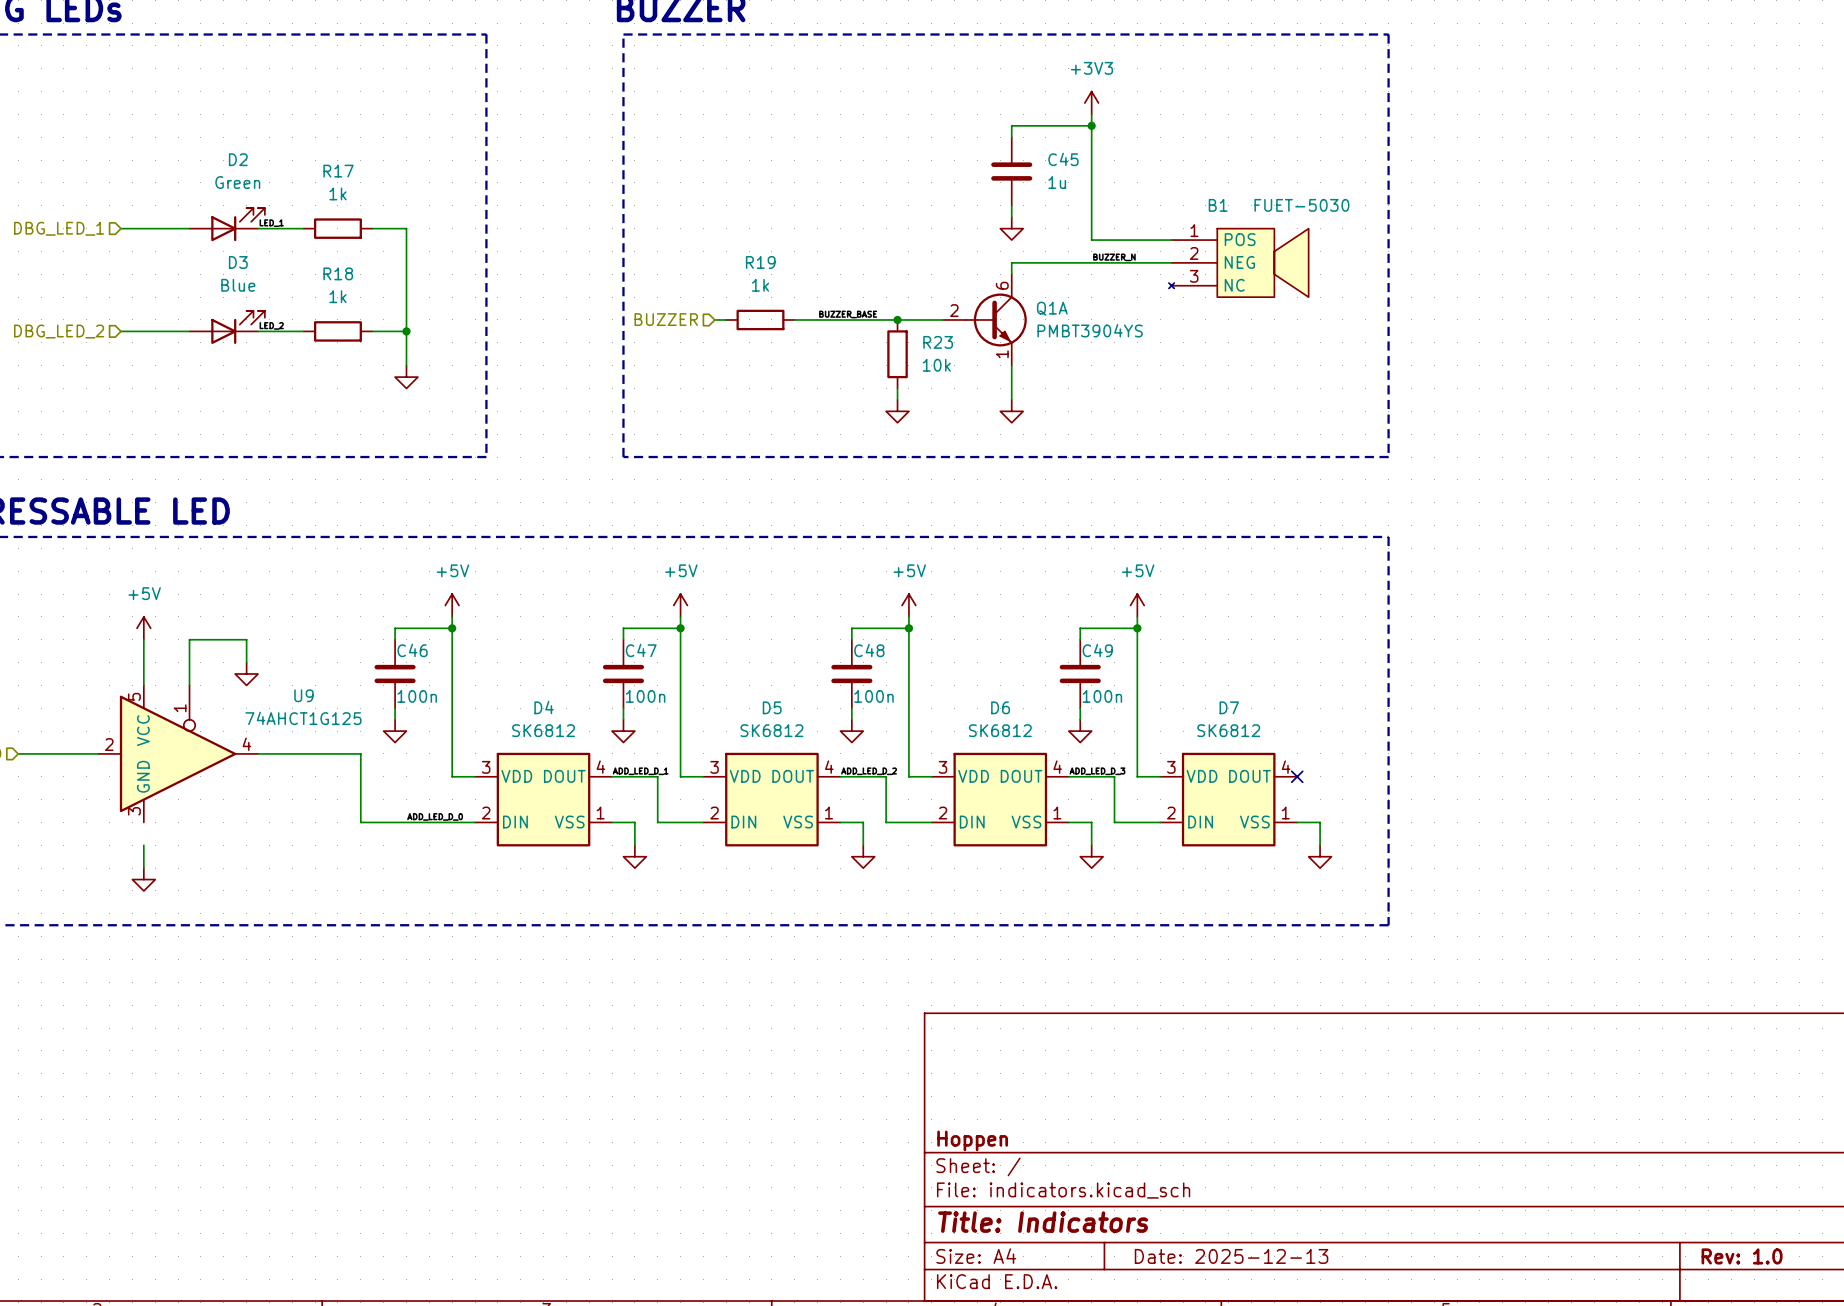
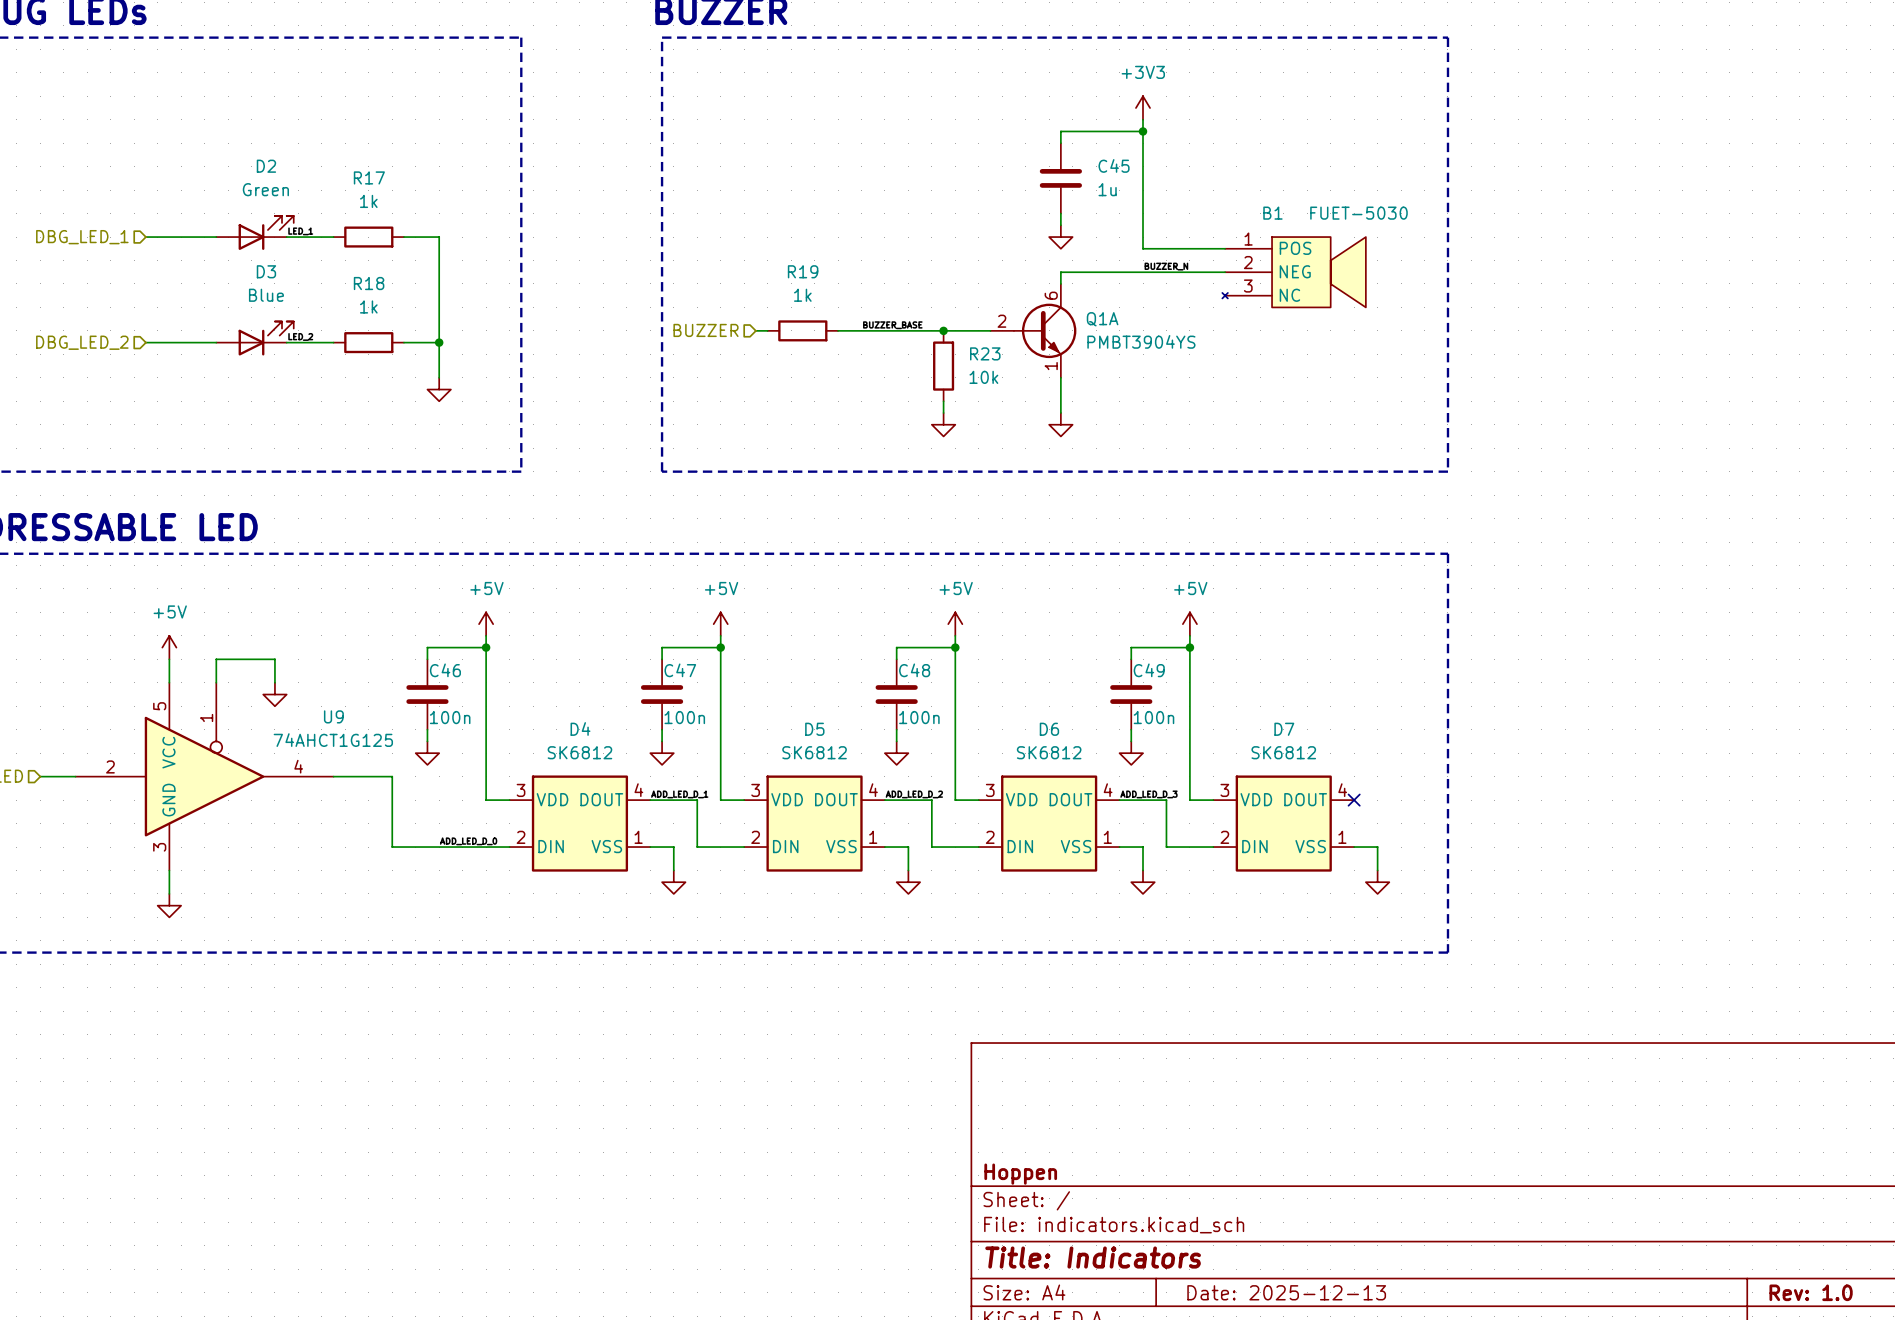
U9 symbol: [98, 685, 259, 823] -> [75, 682, 334, 871]

